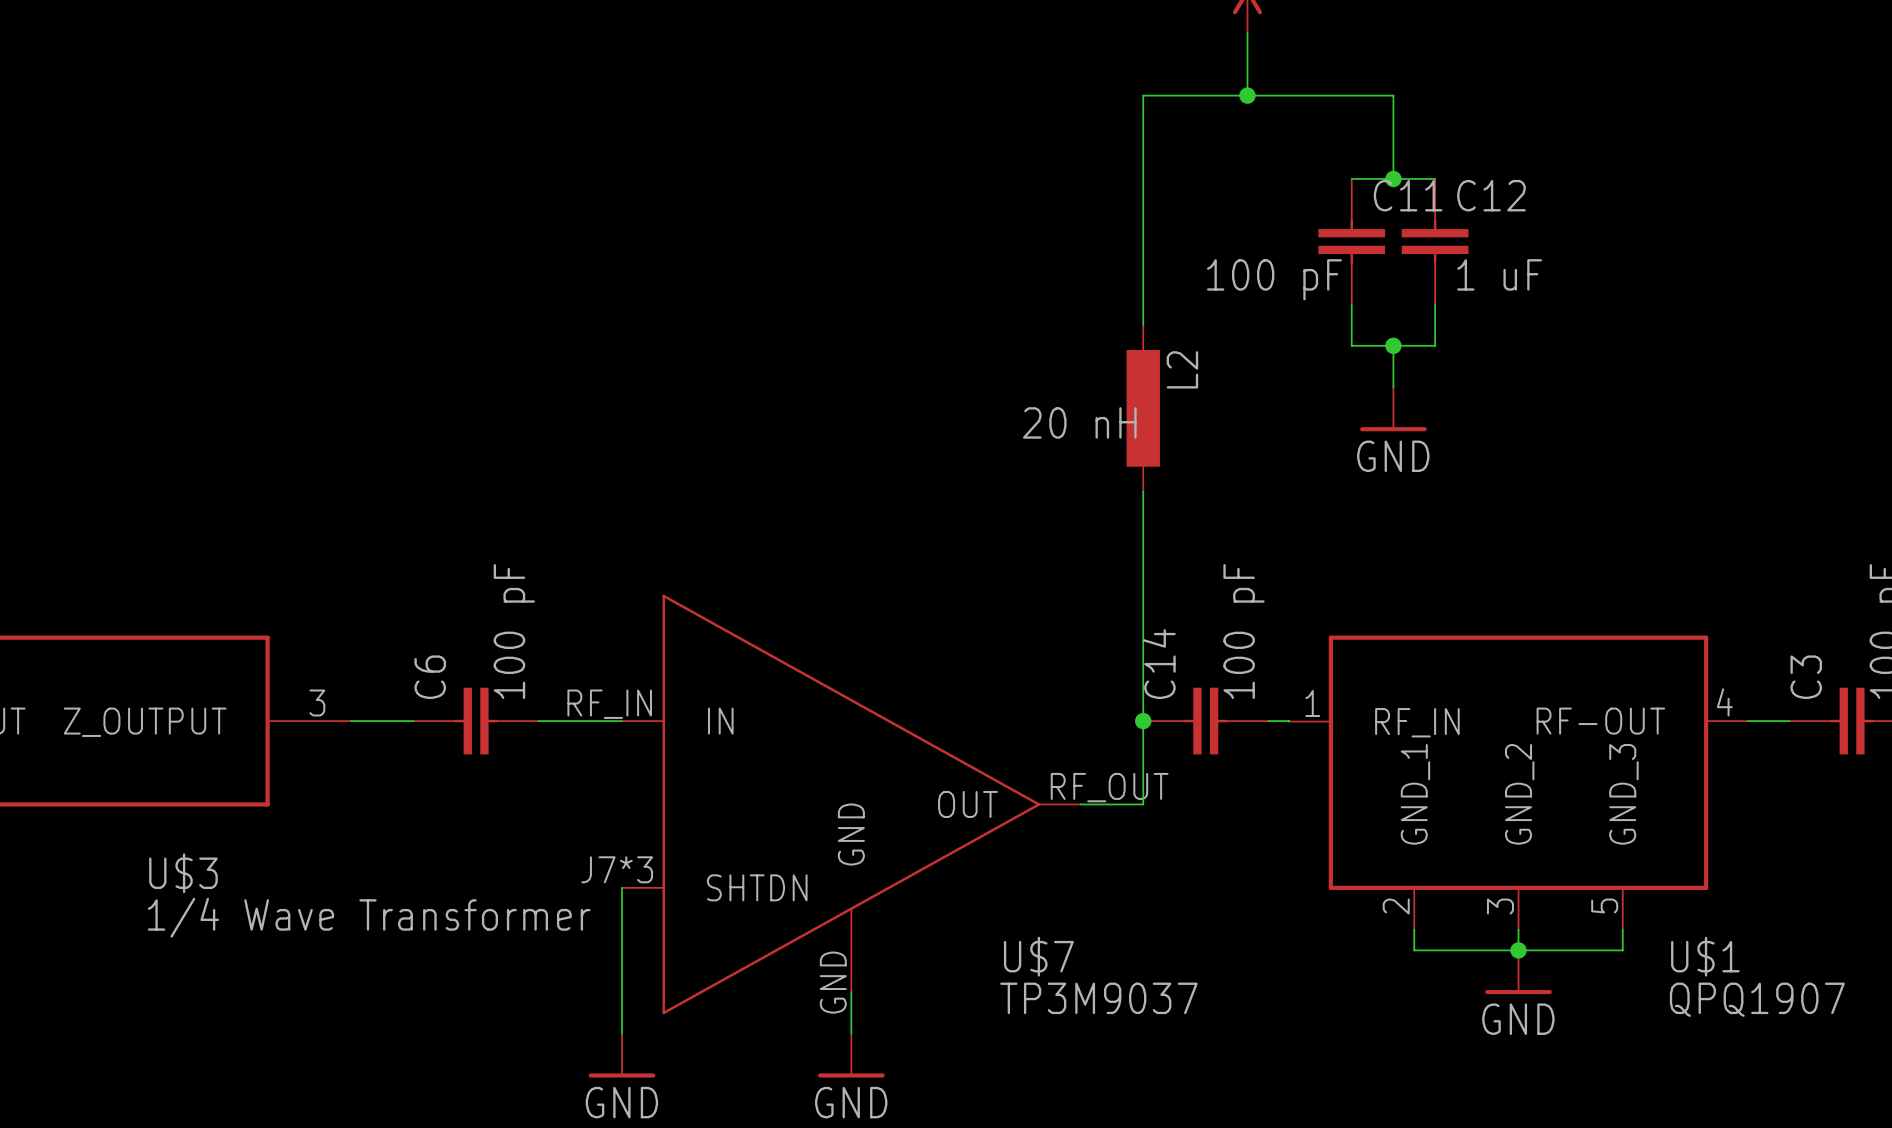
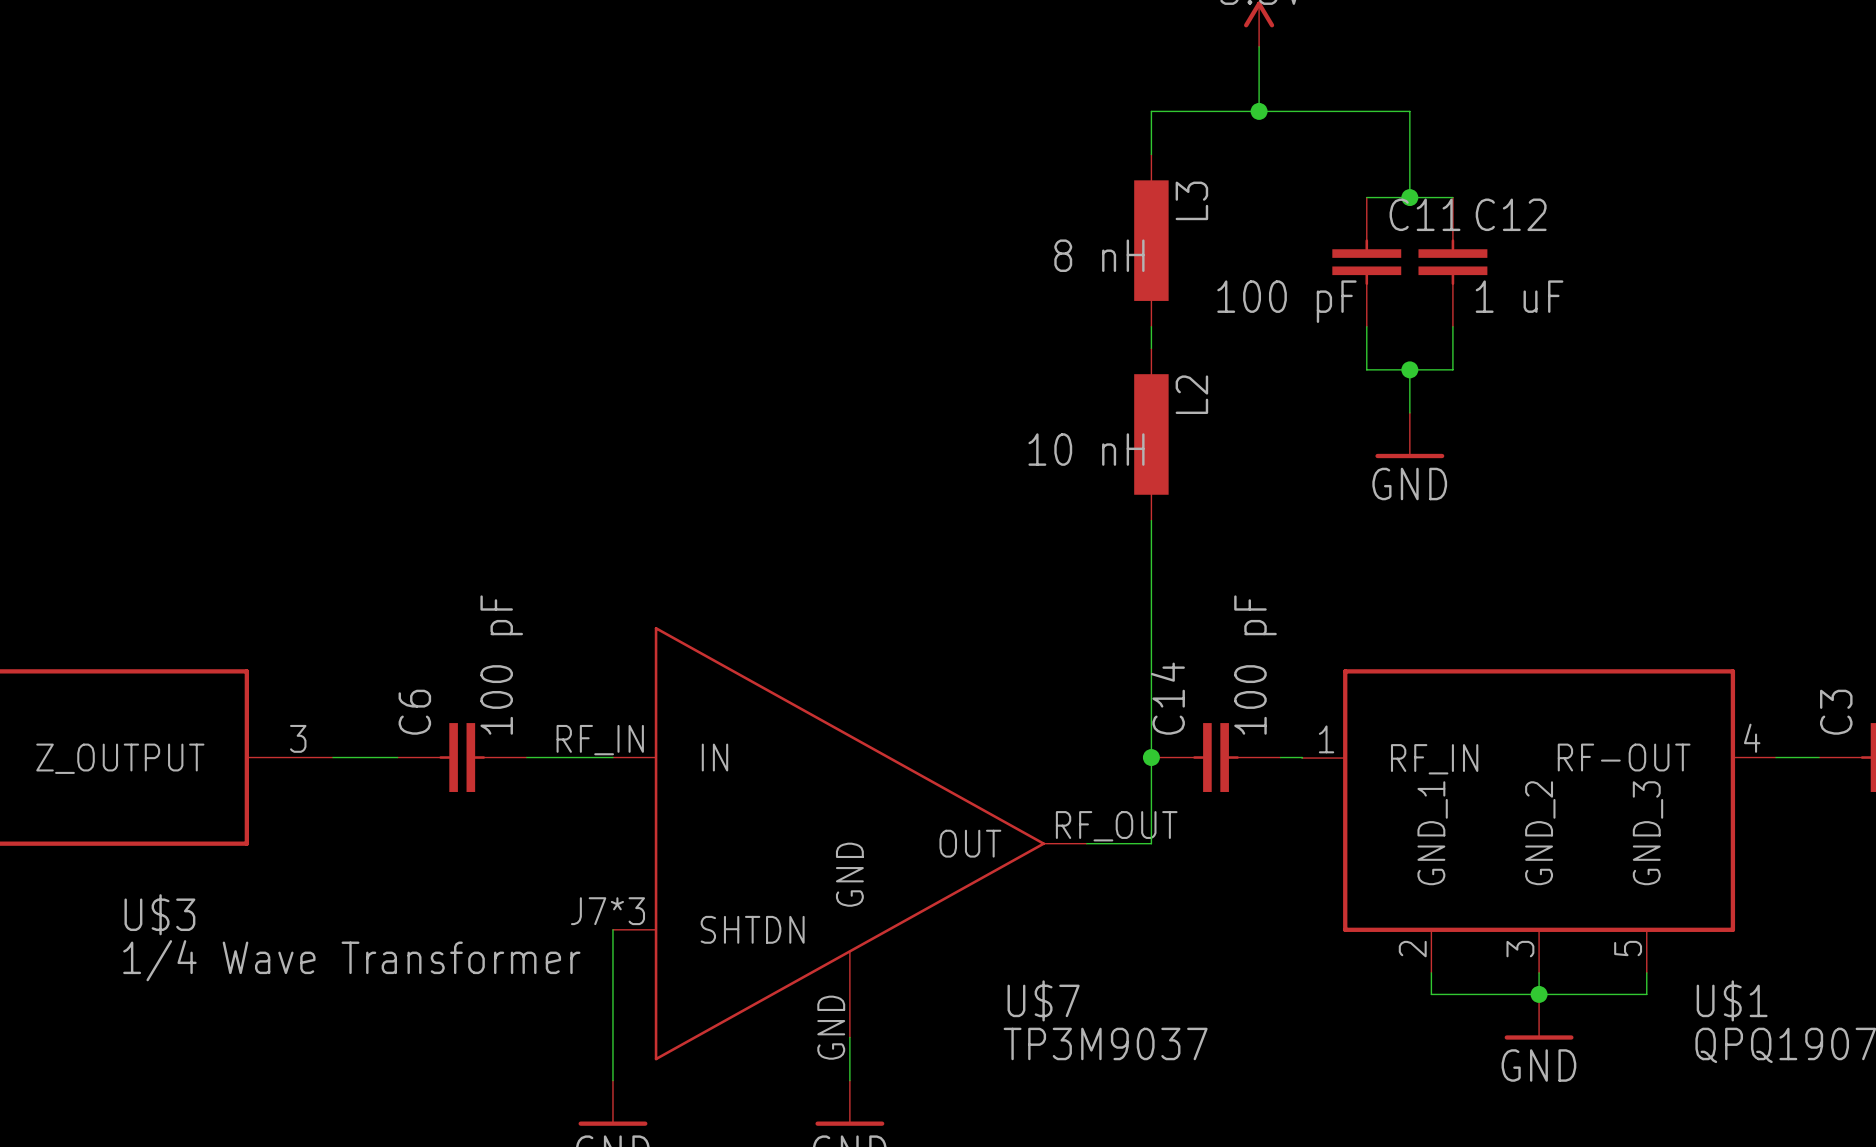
L3: none -> (1151, 240)
L2 text: 20 nH (1079, 422) -> 10 nH (1086, 449)

